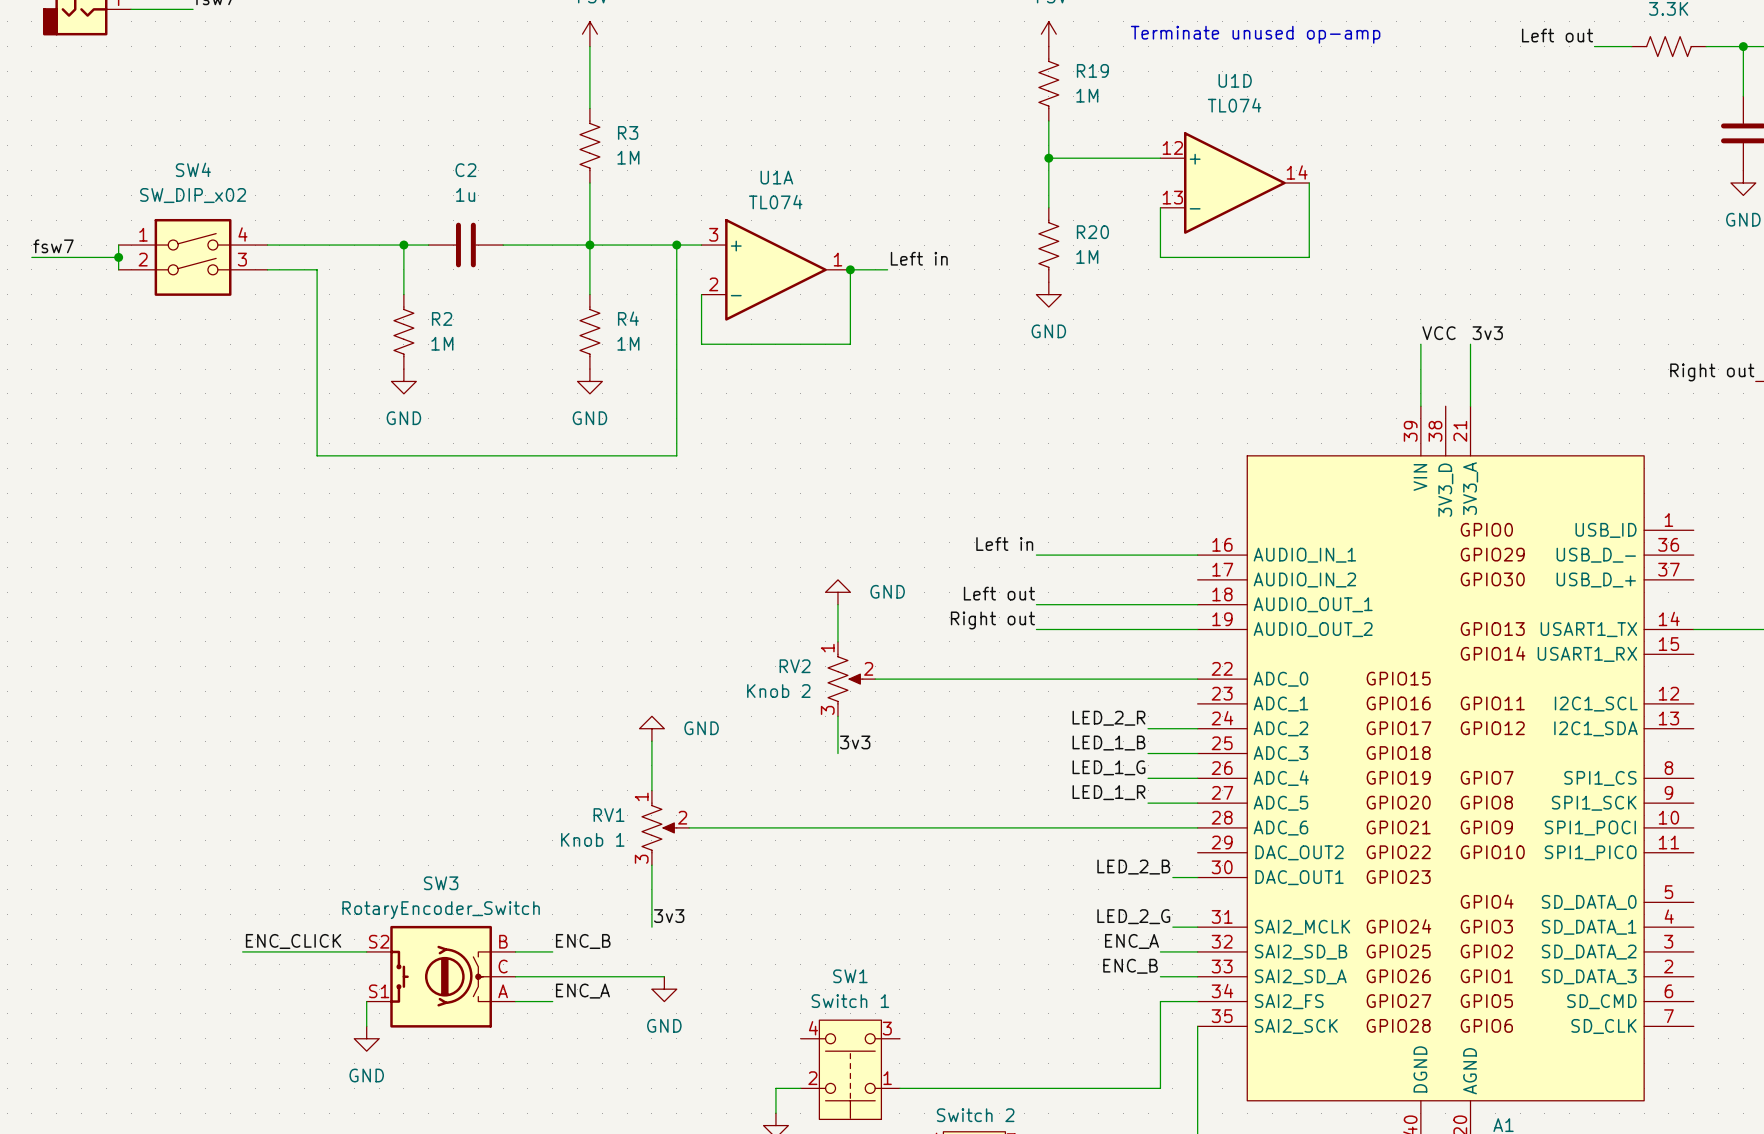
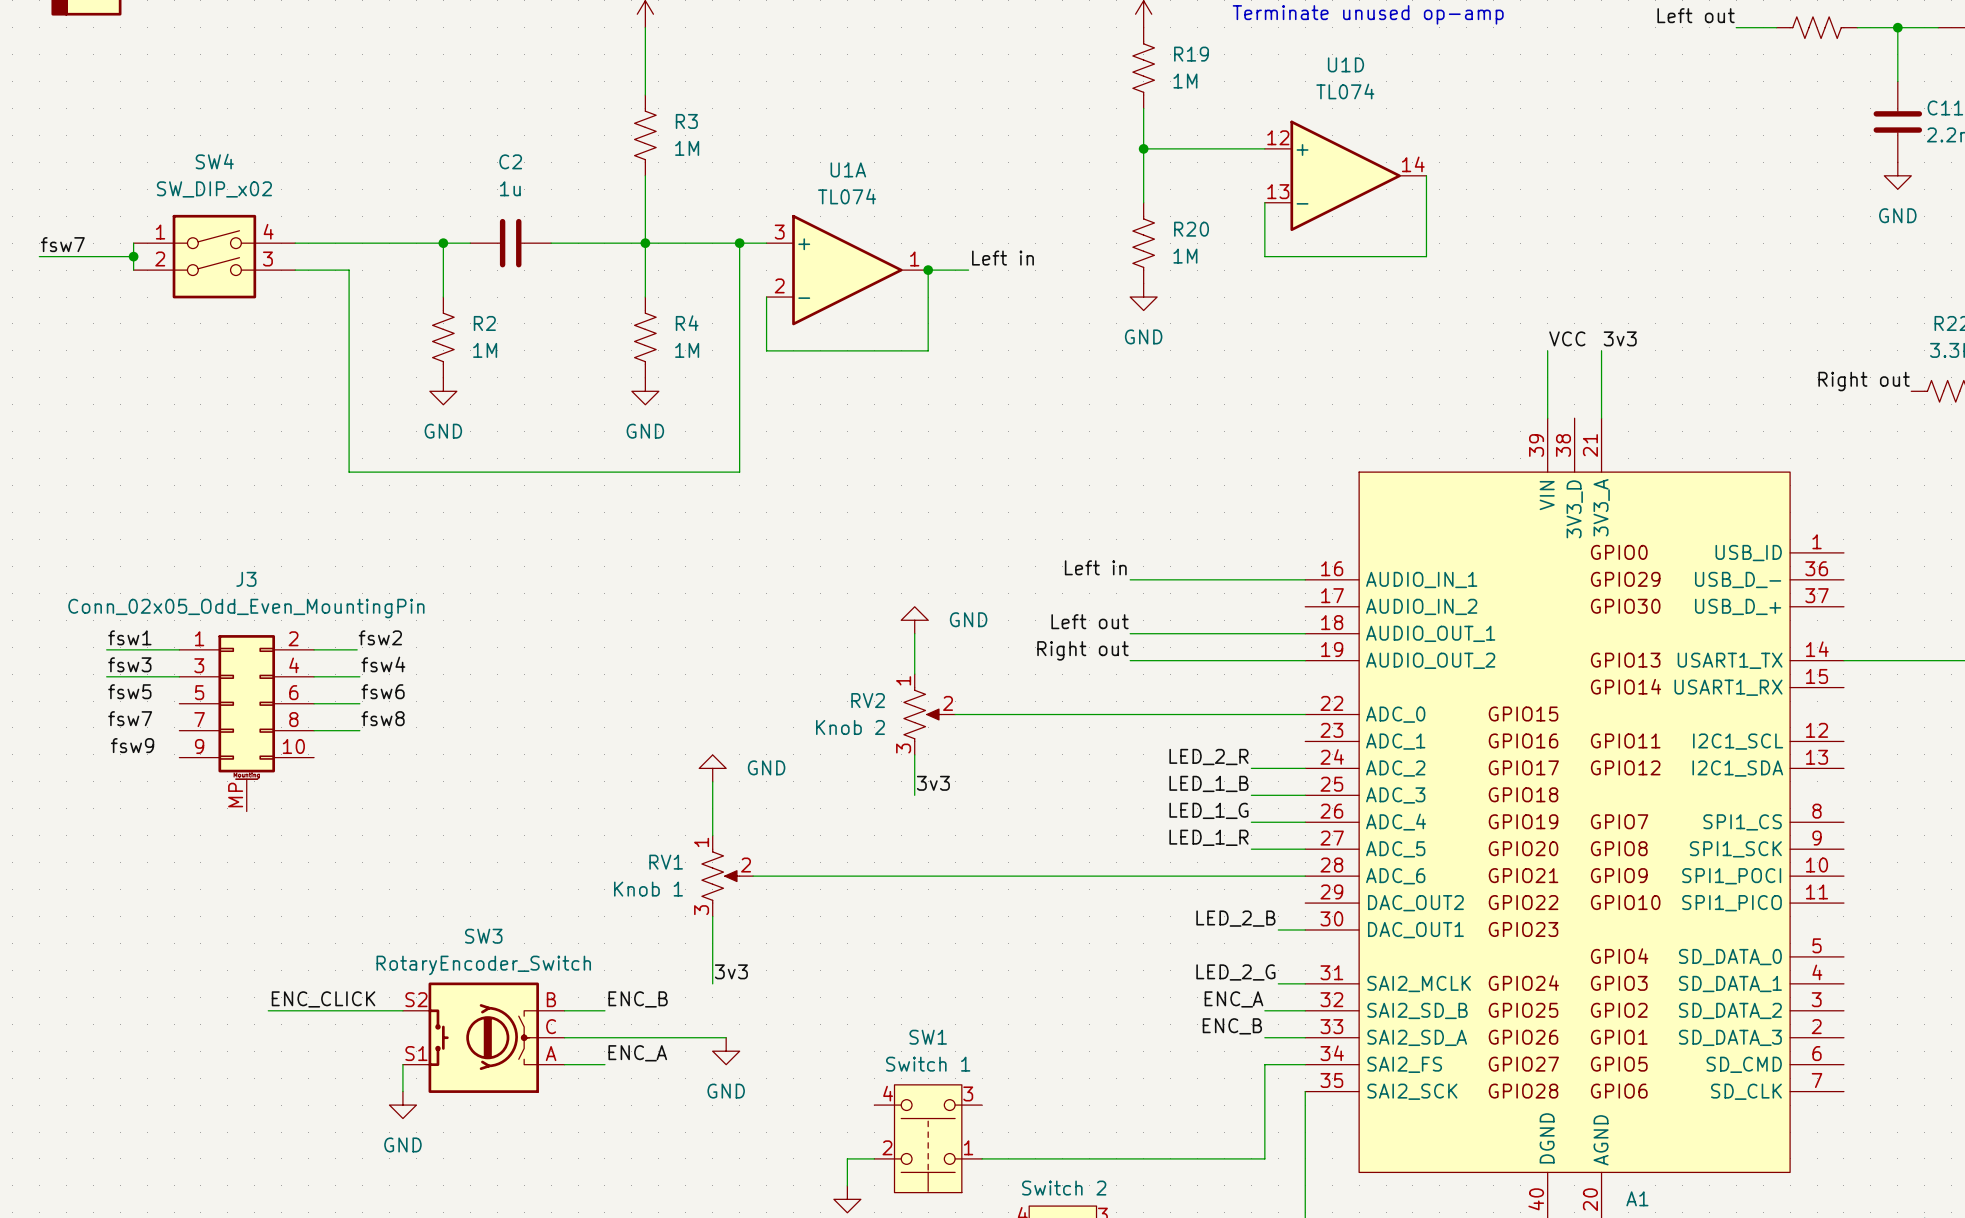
label: none -> fsw1 (129, 637)
label: none -> fsw2 (380, 637)
wire: none -> (106, 649) (179, 649)
wire: none -> (314, 649) (357, 649)
label: none -> fsw3 (129, 664)
label: none -> fsw4 (383, 664)
wire: none -> (106, 676) (179, 676)
wire: none -> (314, 676) (359, 676)
label: none -> fsw5 (129, 691)
label: none -> fsw6 (383, 691)
wire: none -> (314, 703) (359, 703)
label: none -> fsw7 (130, 718)
label: none -> fsw8 (383, 718)
J3: none -> Conn_02x05_Odd_Even_MountingPin (246, 723)
wire: none -> (314, 730) (359, 730)
label: none -> fsw9 (132, 745)

